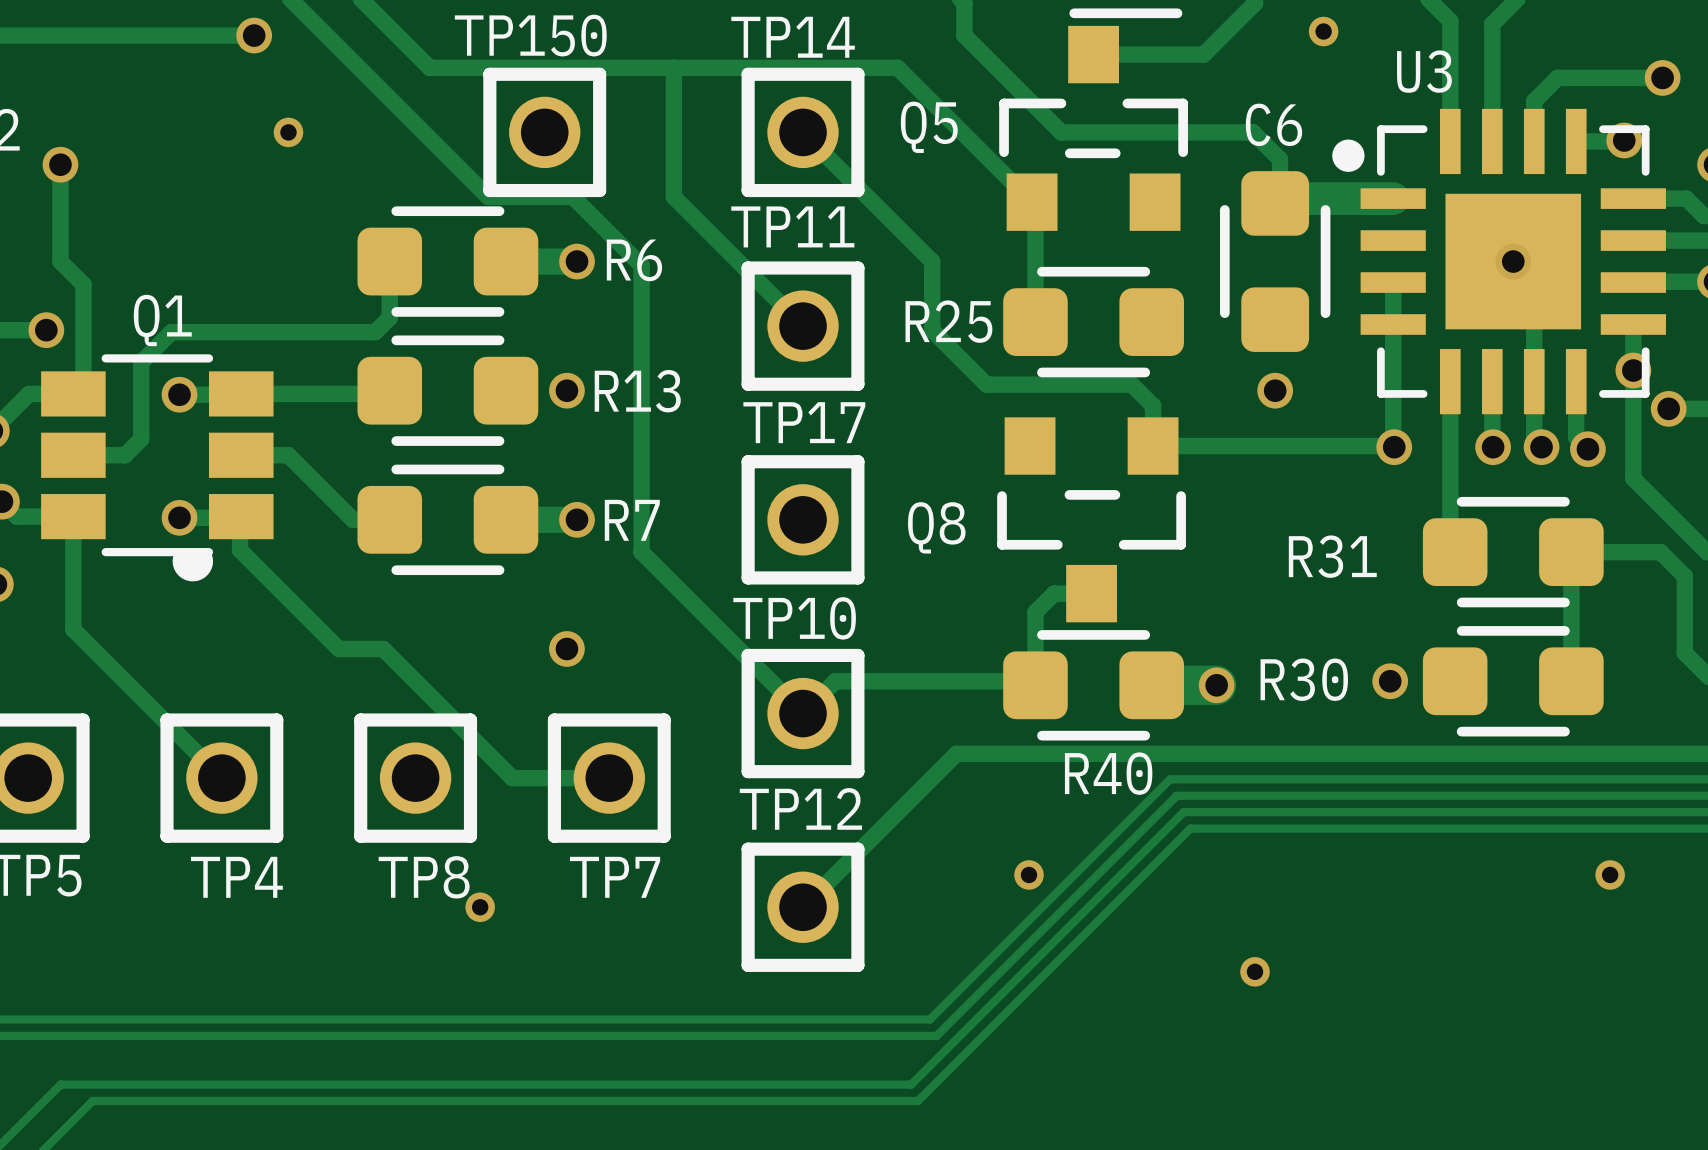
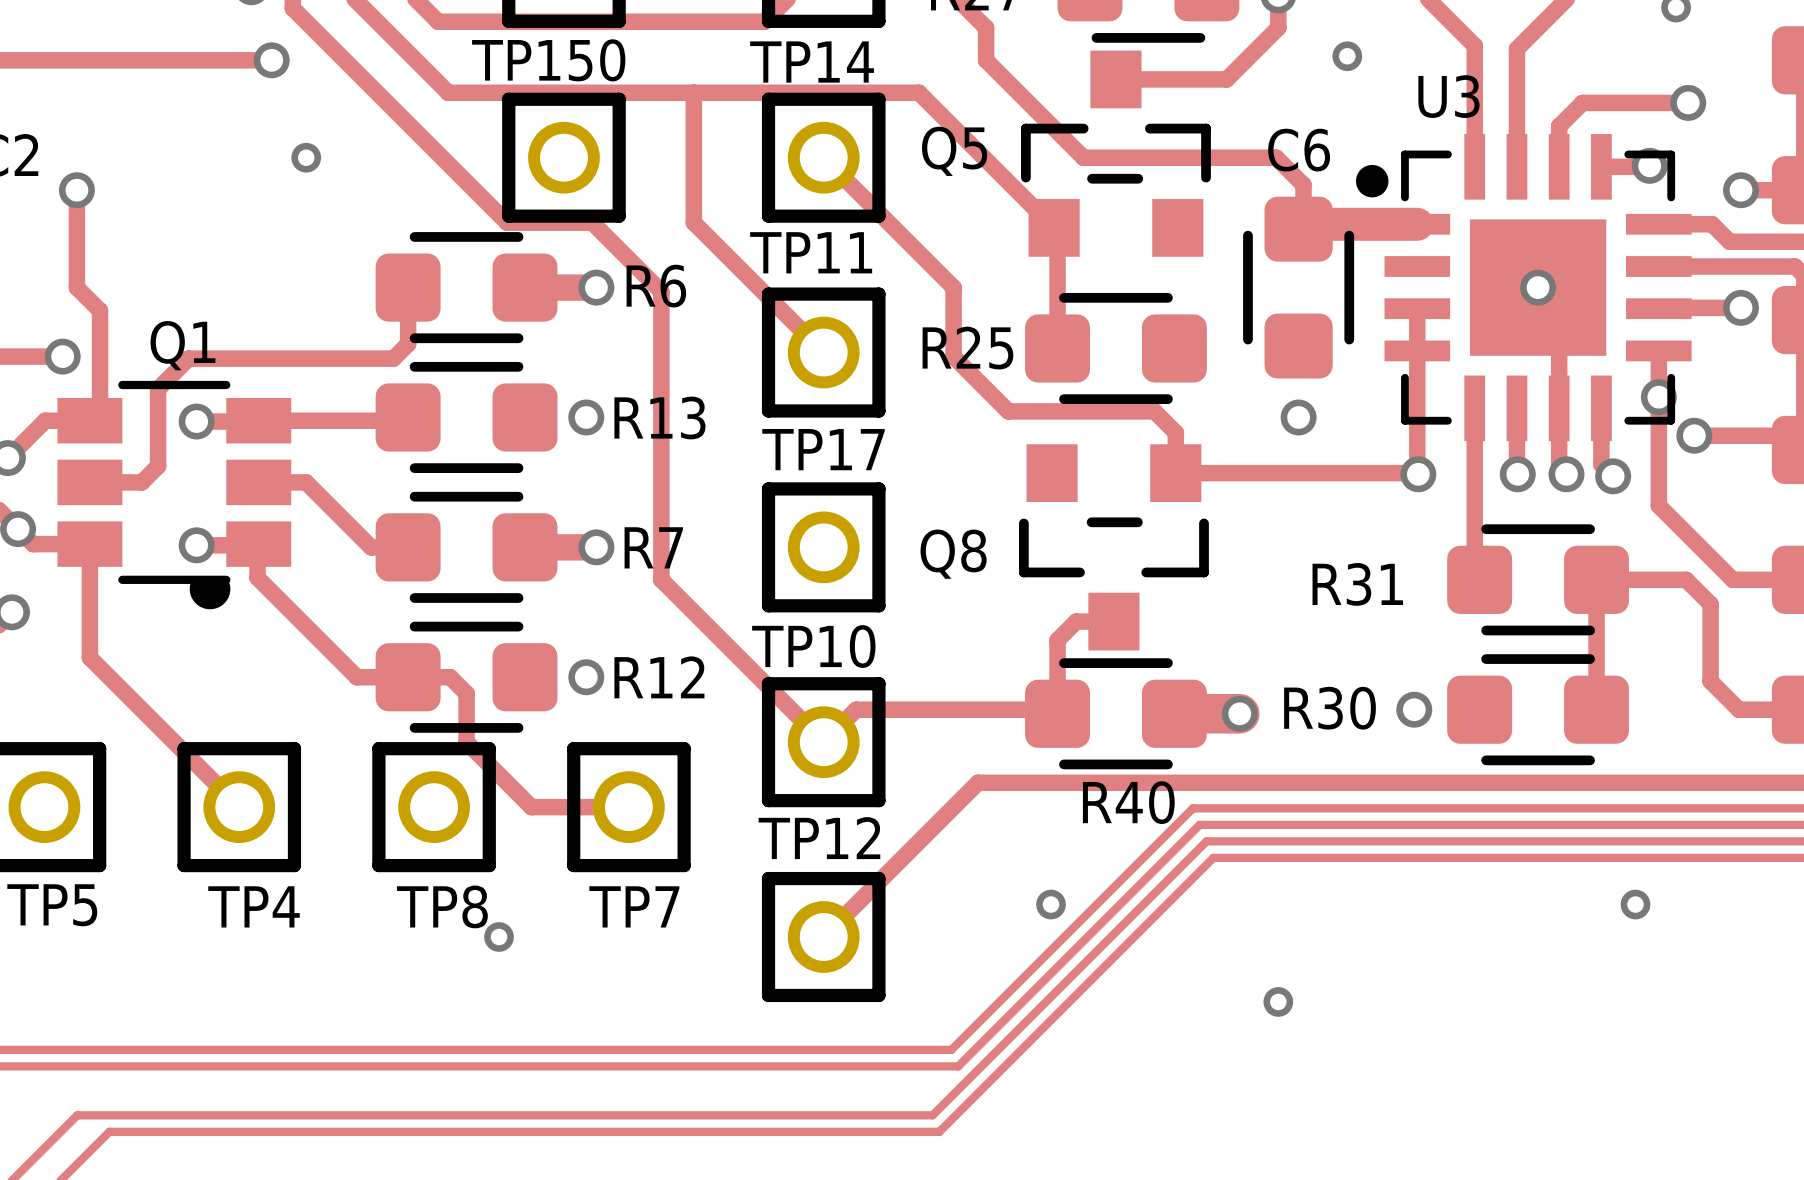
track: (383, 648) (447, 713) -> (401, 677) (450, 677) (466, 693) (466, 742)
R12: none -> (466, 677)

